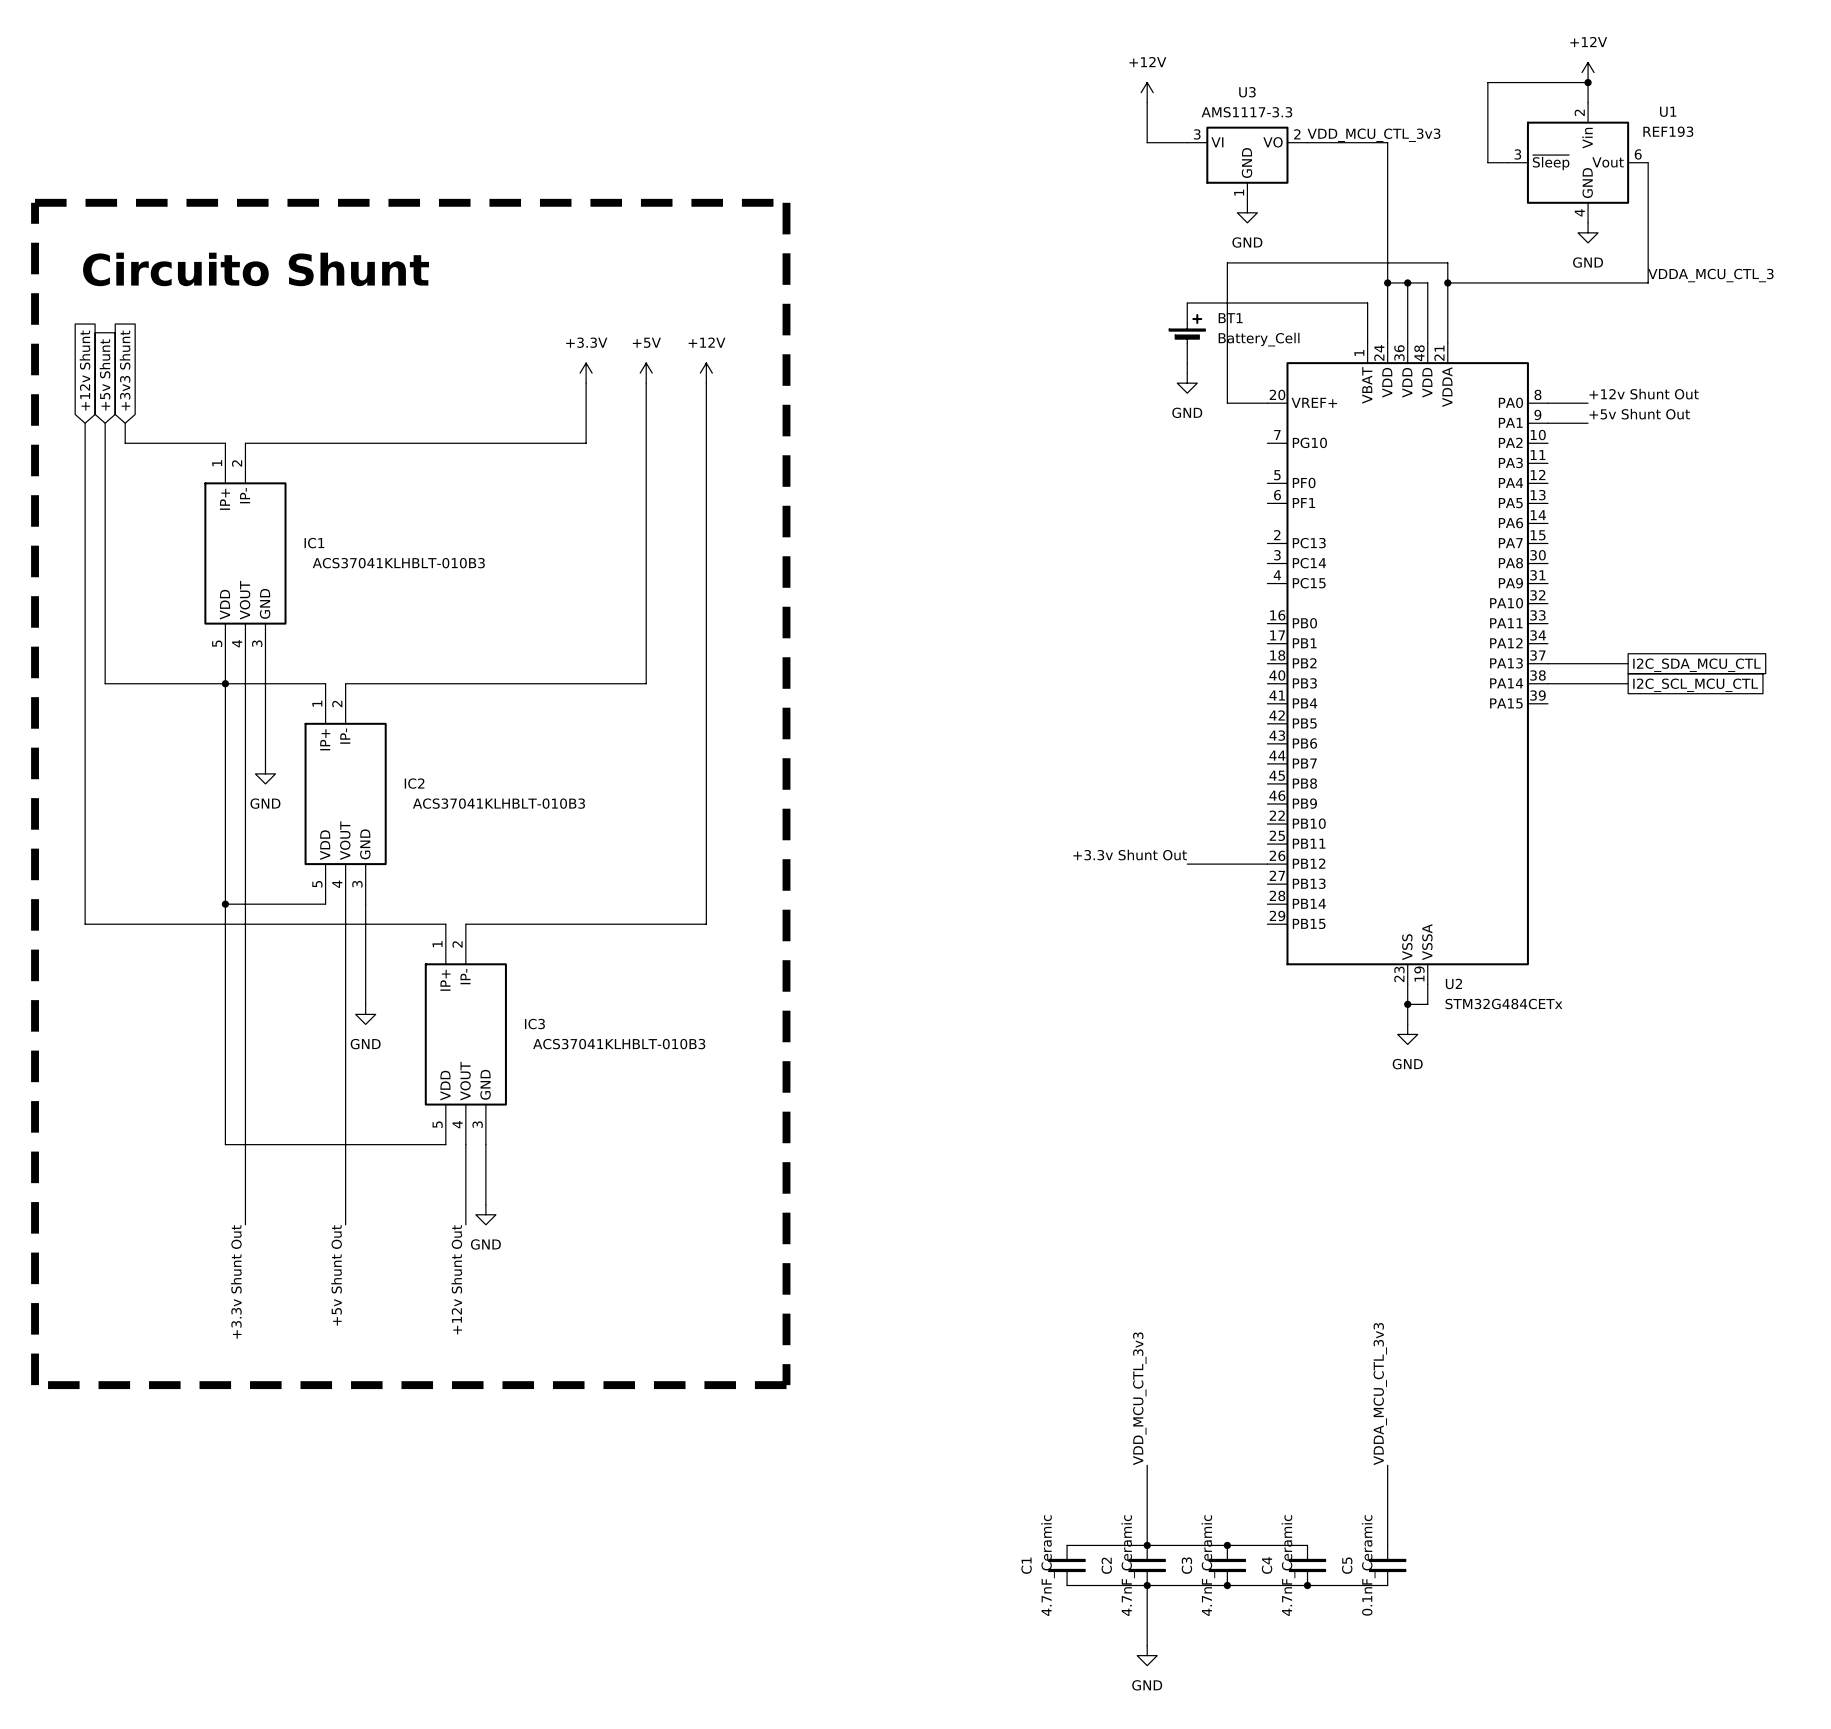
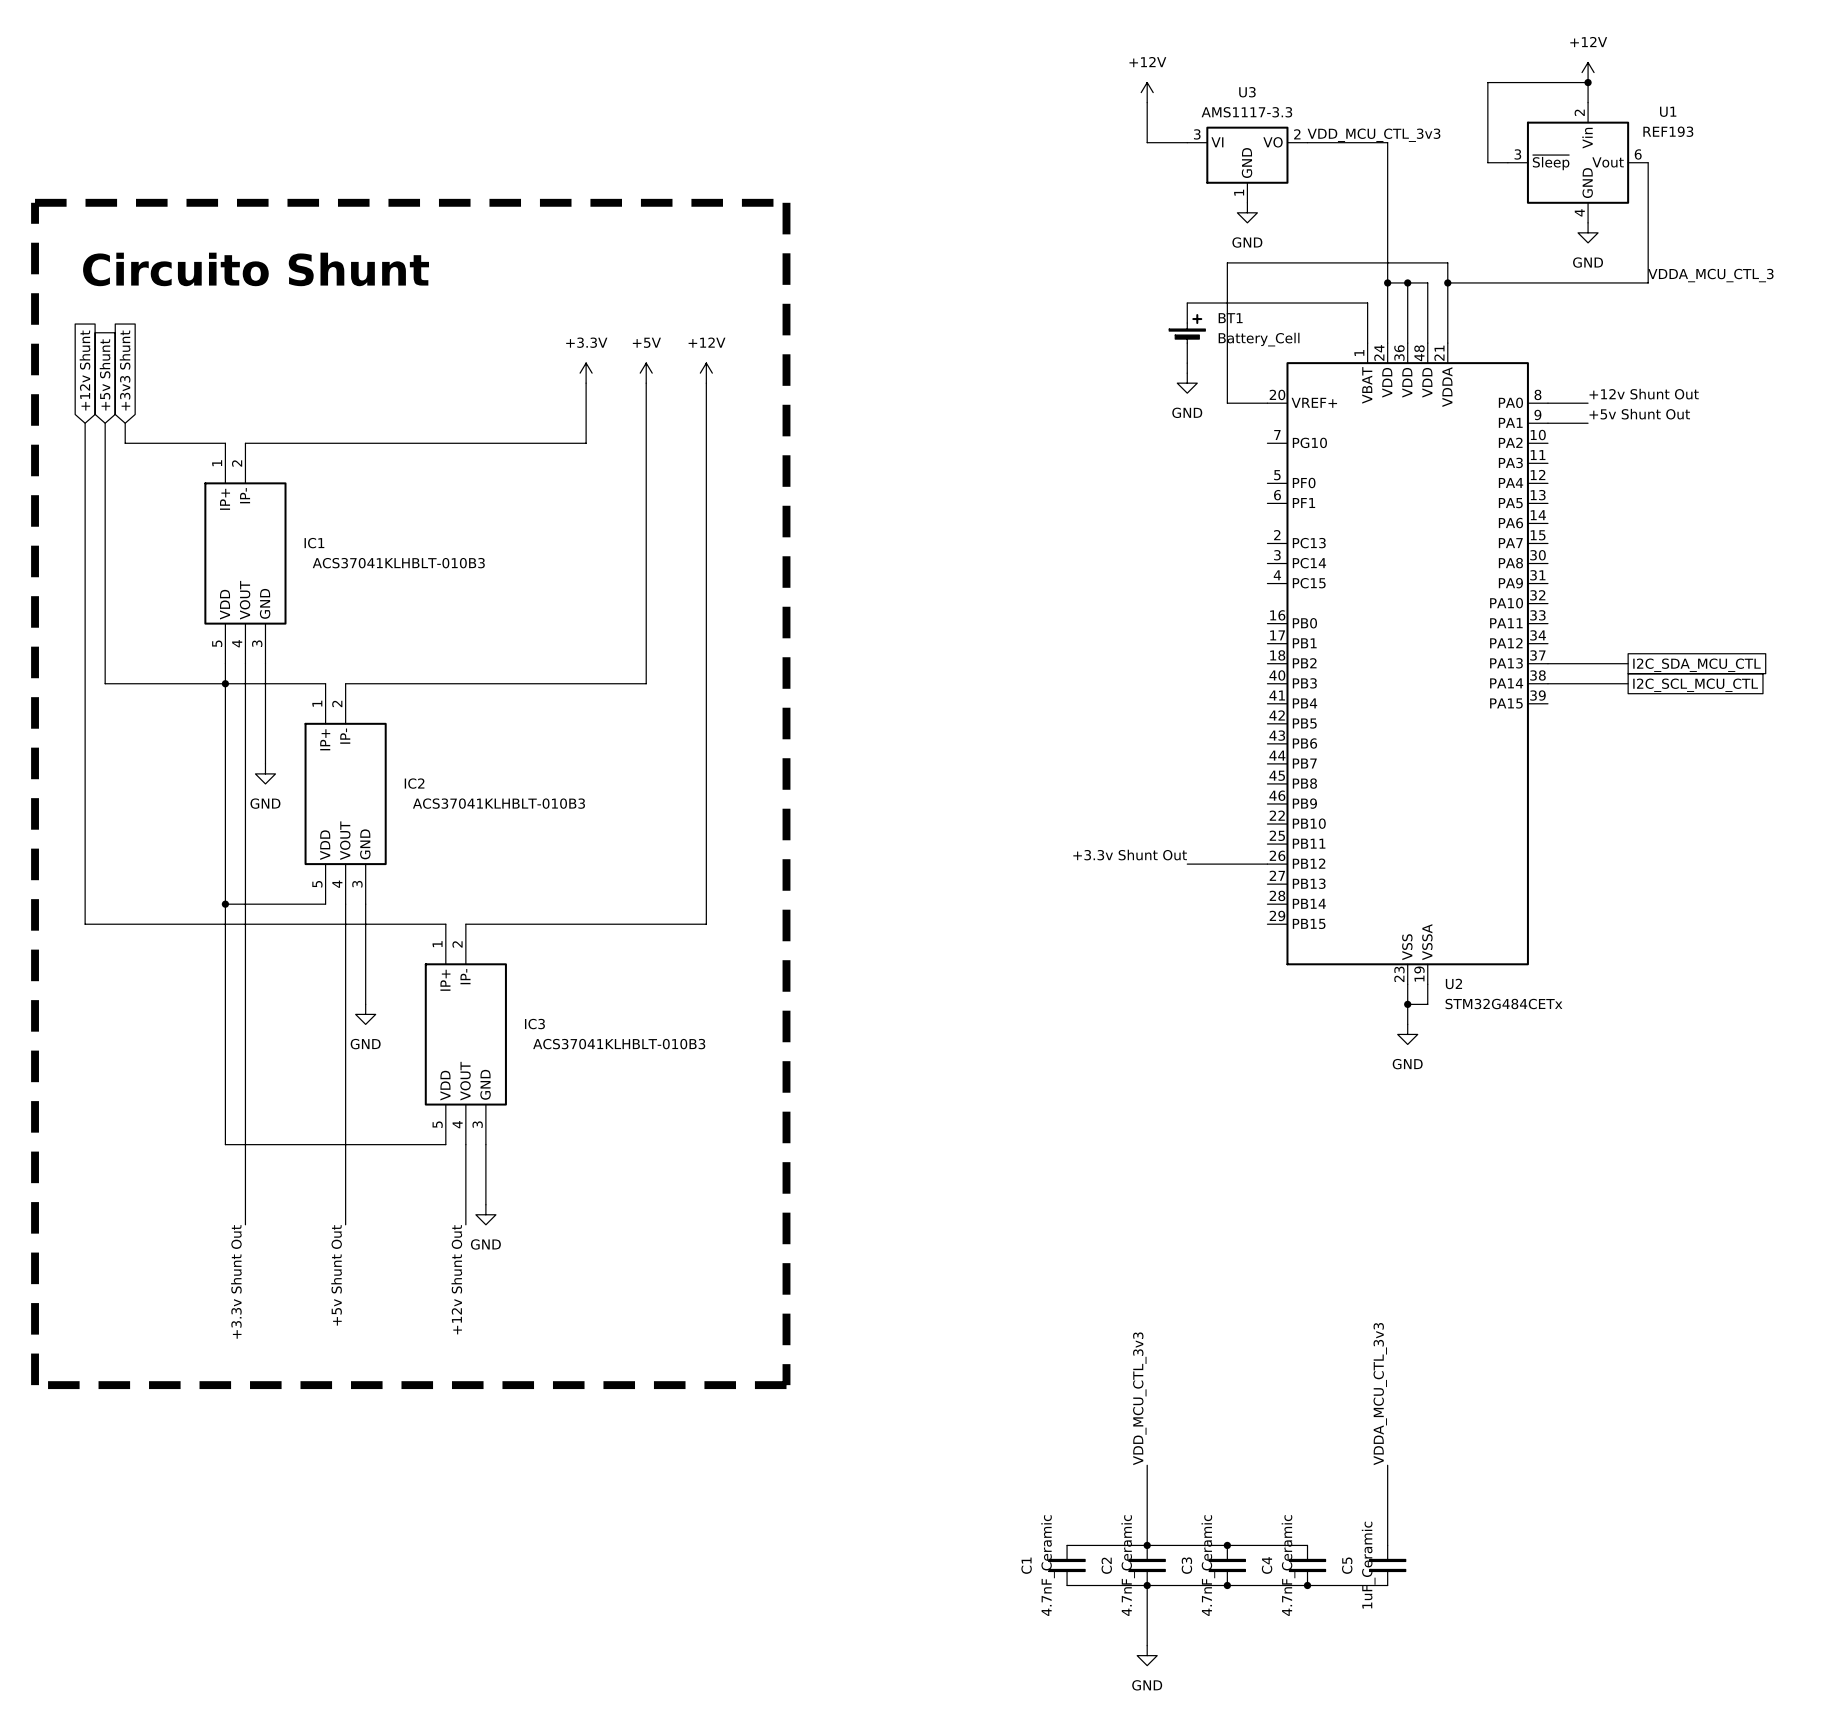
C5 value: 0.1nF_Ceramic (1368, 1565) -> 1uF_Ceramic (1368, 1565)

